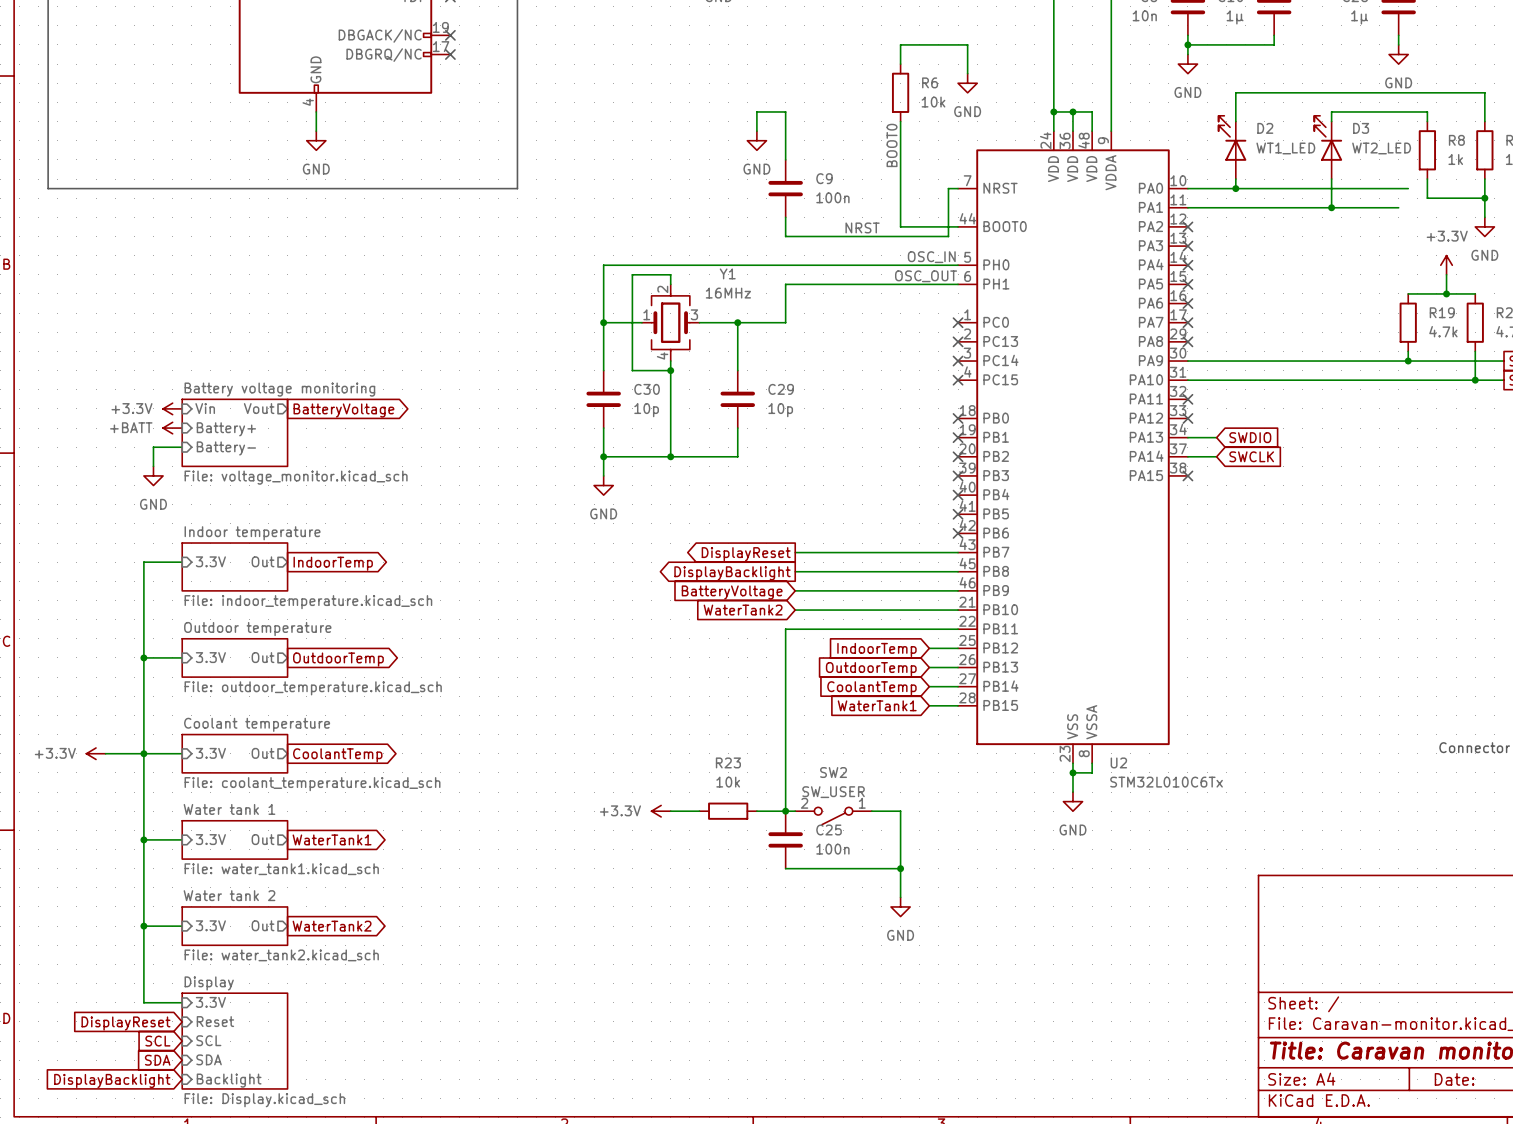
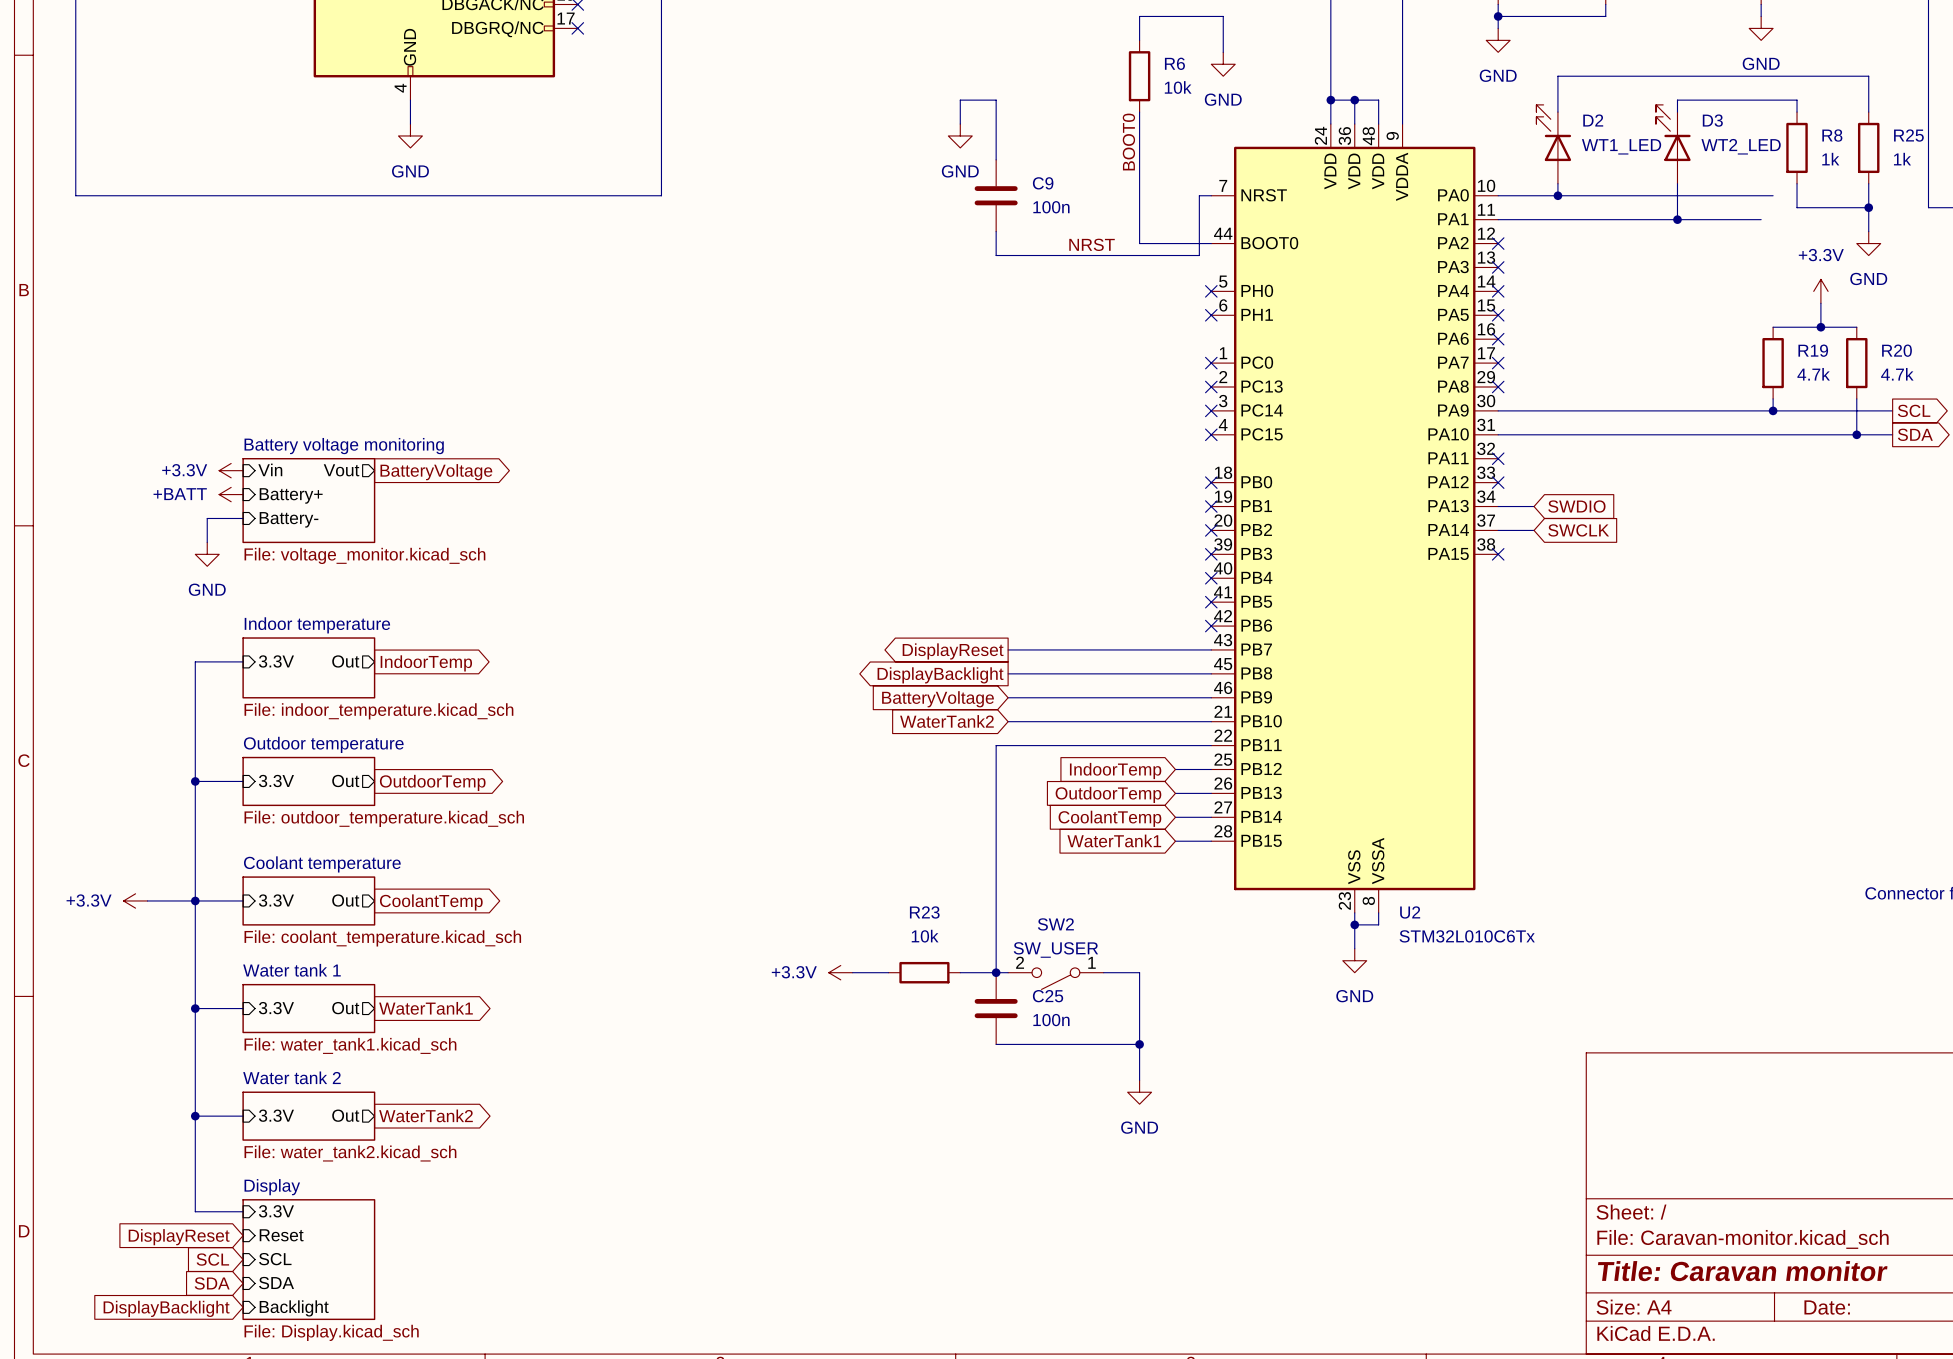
label: OSC_IN (931, 257) -> none
wire: (958, 265) (603, 265) (603, 370) -> none
no-connect mark: none -> (1211, 291)
label: OSC_OUT (926, 276) -> none
wire: (670, 284) (670, 274) (632, 274) (632, 370) (670, 370) -> none
wire: (958, 284) (785, 284) (785, 322) (699, 322) -> none
no-connect mark: none -> (1211, 315)
wire: (603, 322) (641, 322) -> none
junction: (603, 322) -> none
Y1: 16MHz (670, 322) -> none
wire: (737, 322) (737, 370) -> none
junction: (737, 322) -> none
wire: (670, 361) (670, 456) -> none
junction: (670, 370) -> none
C30: 10p (603, 399) -> none
C29: 10p (737, 399) -> none
wire: (603, 428) (603, 475) -> none
wire: (737, 428) (737, 456) (603, 456) -> none
junction: (603, 456) -> none
junction: (670, 456) -> none
power symbol: GND (603, 485) -> none

